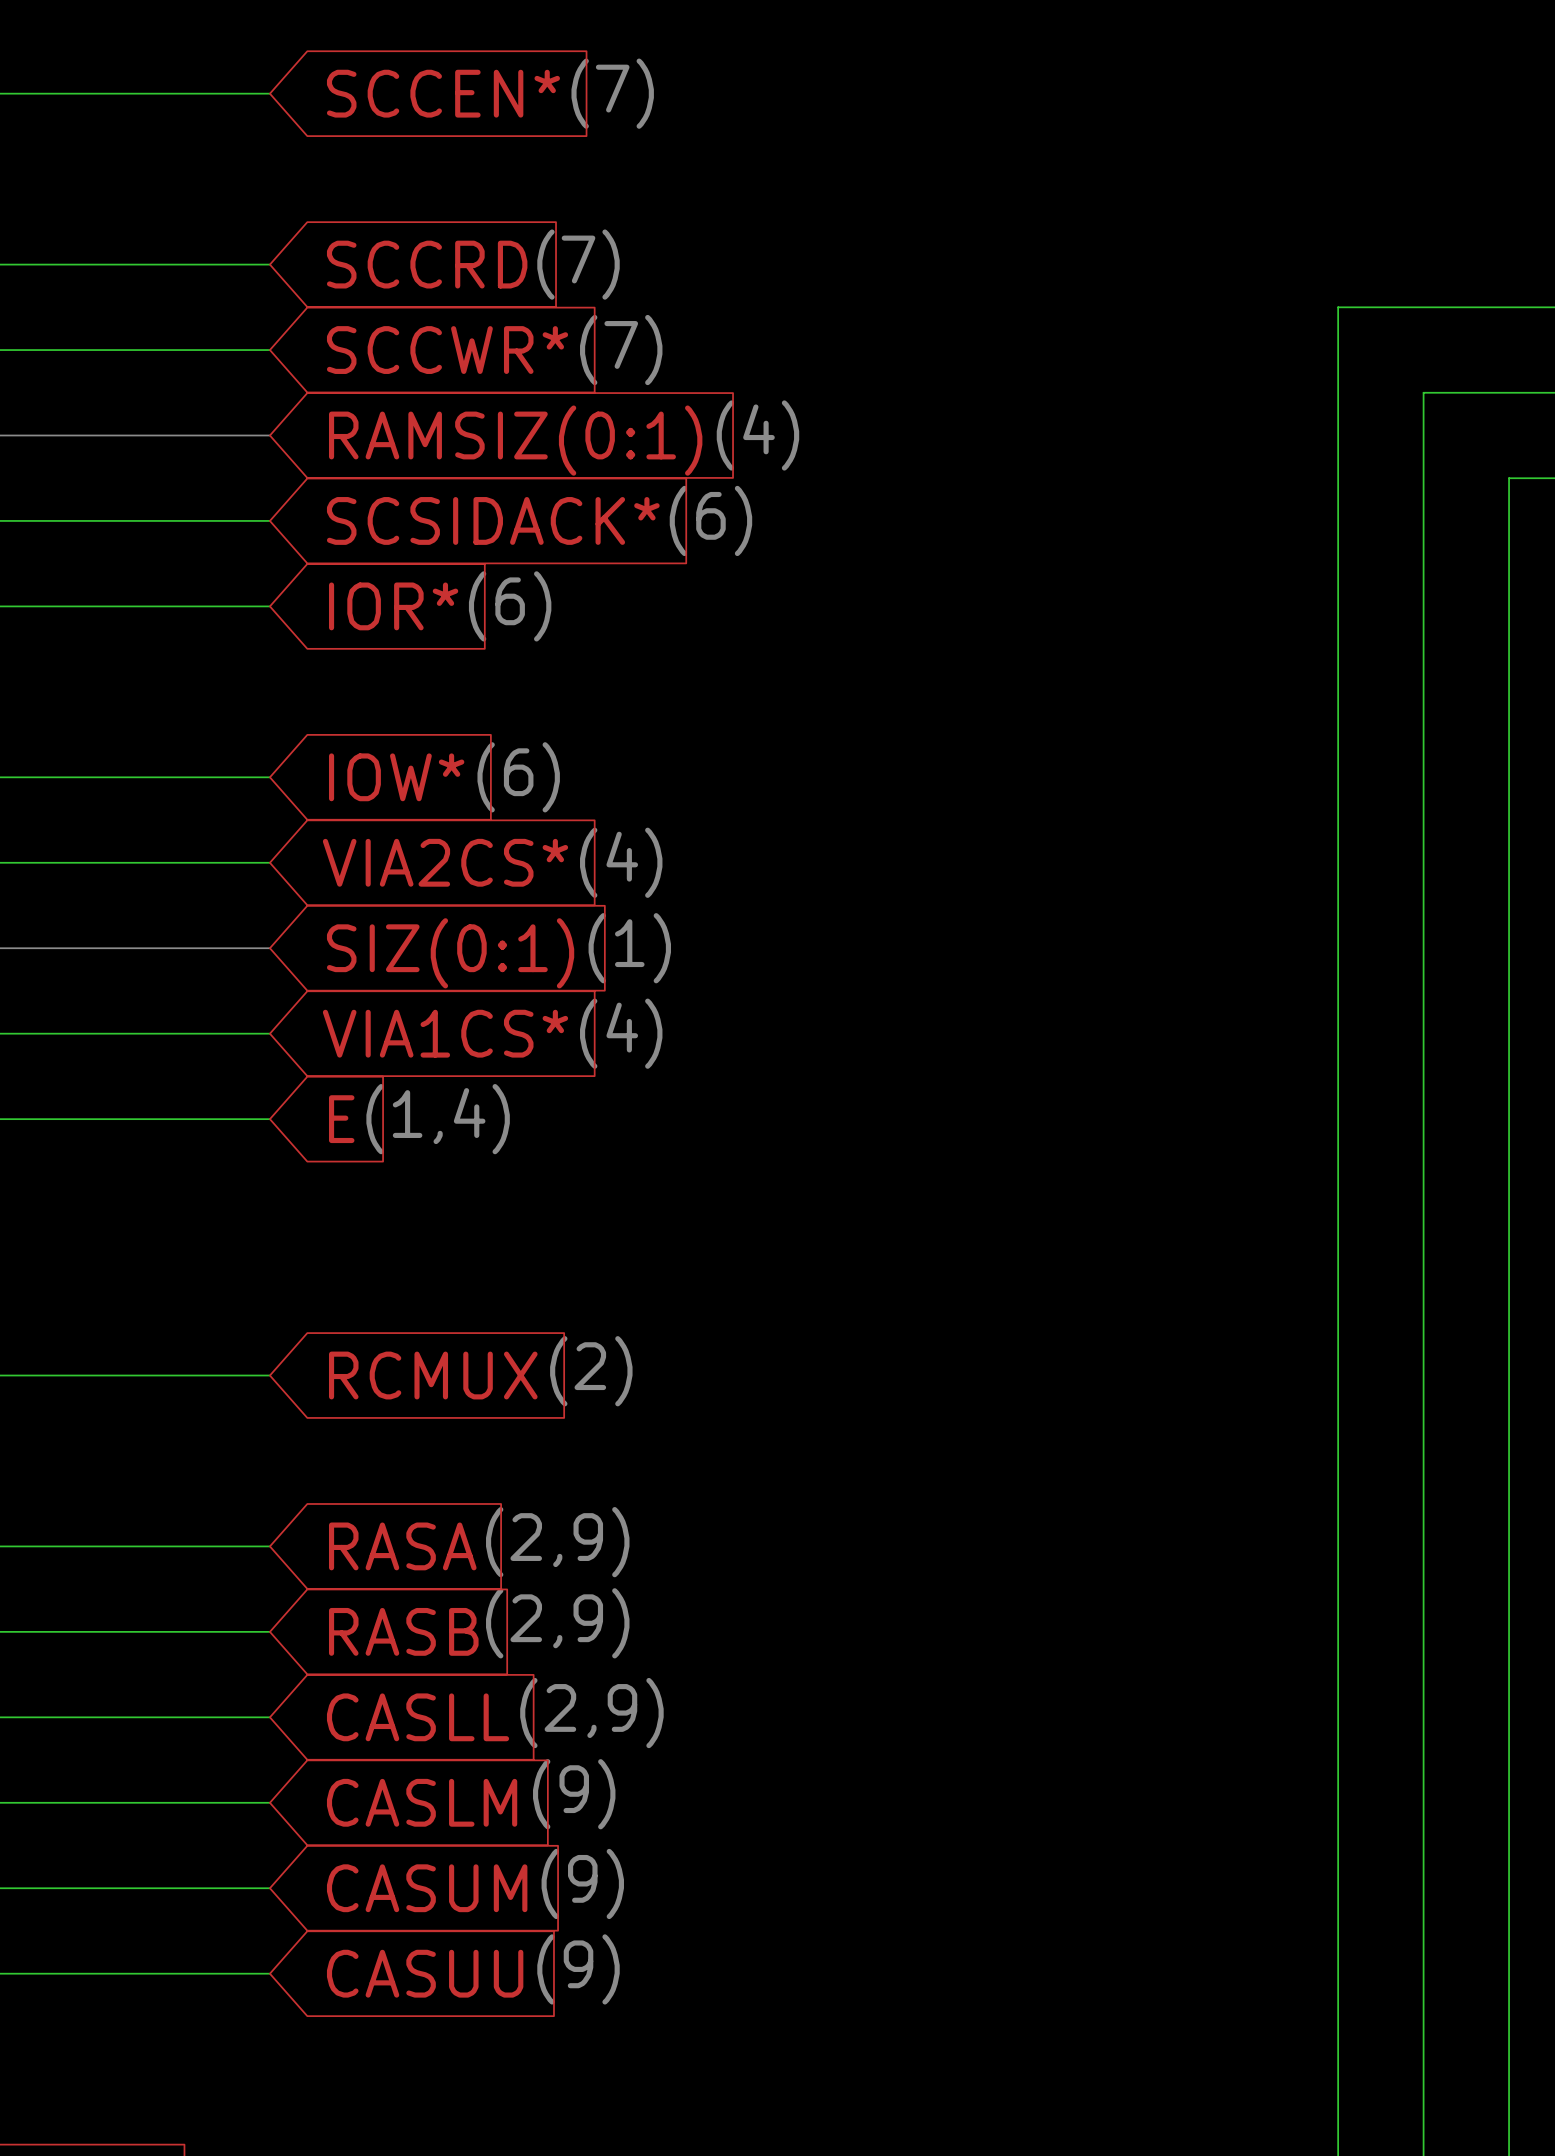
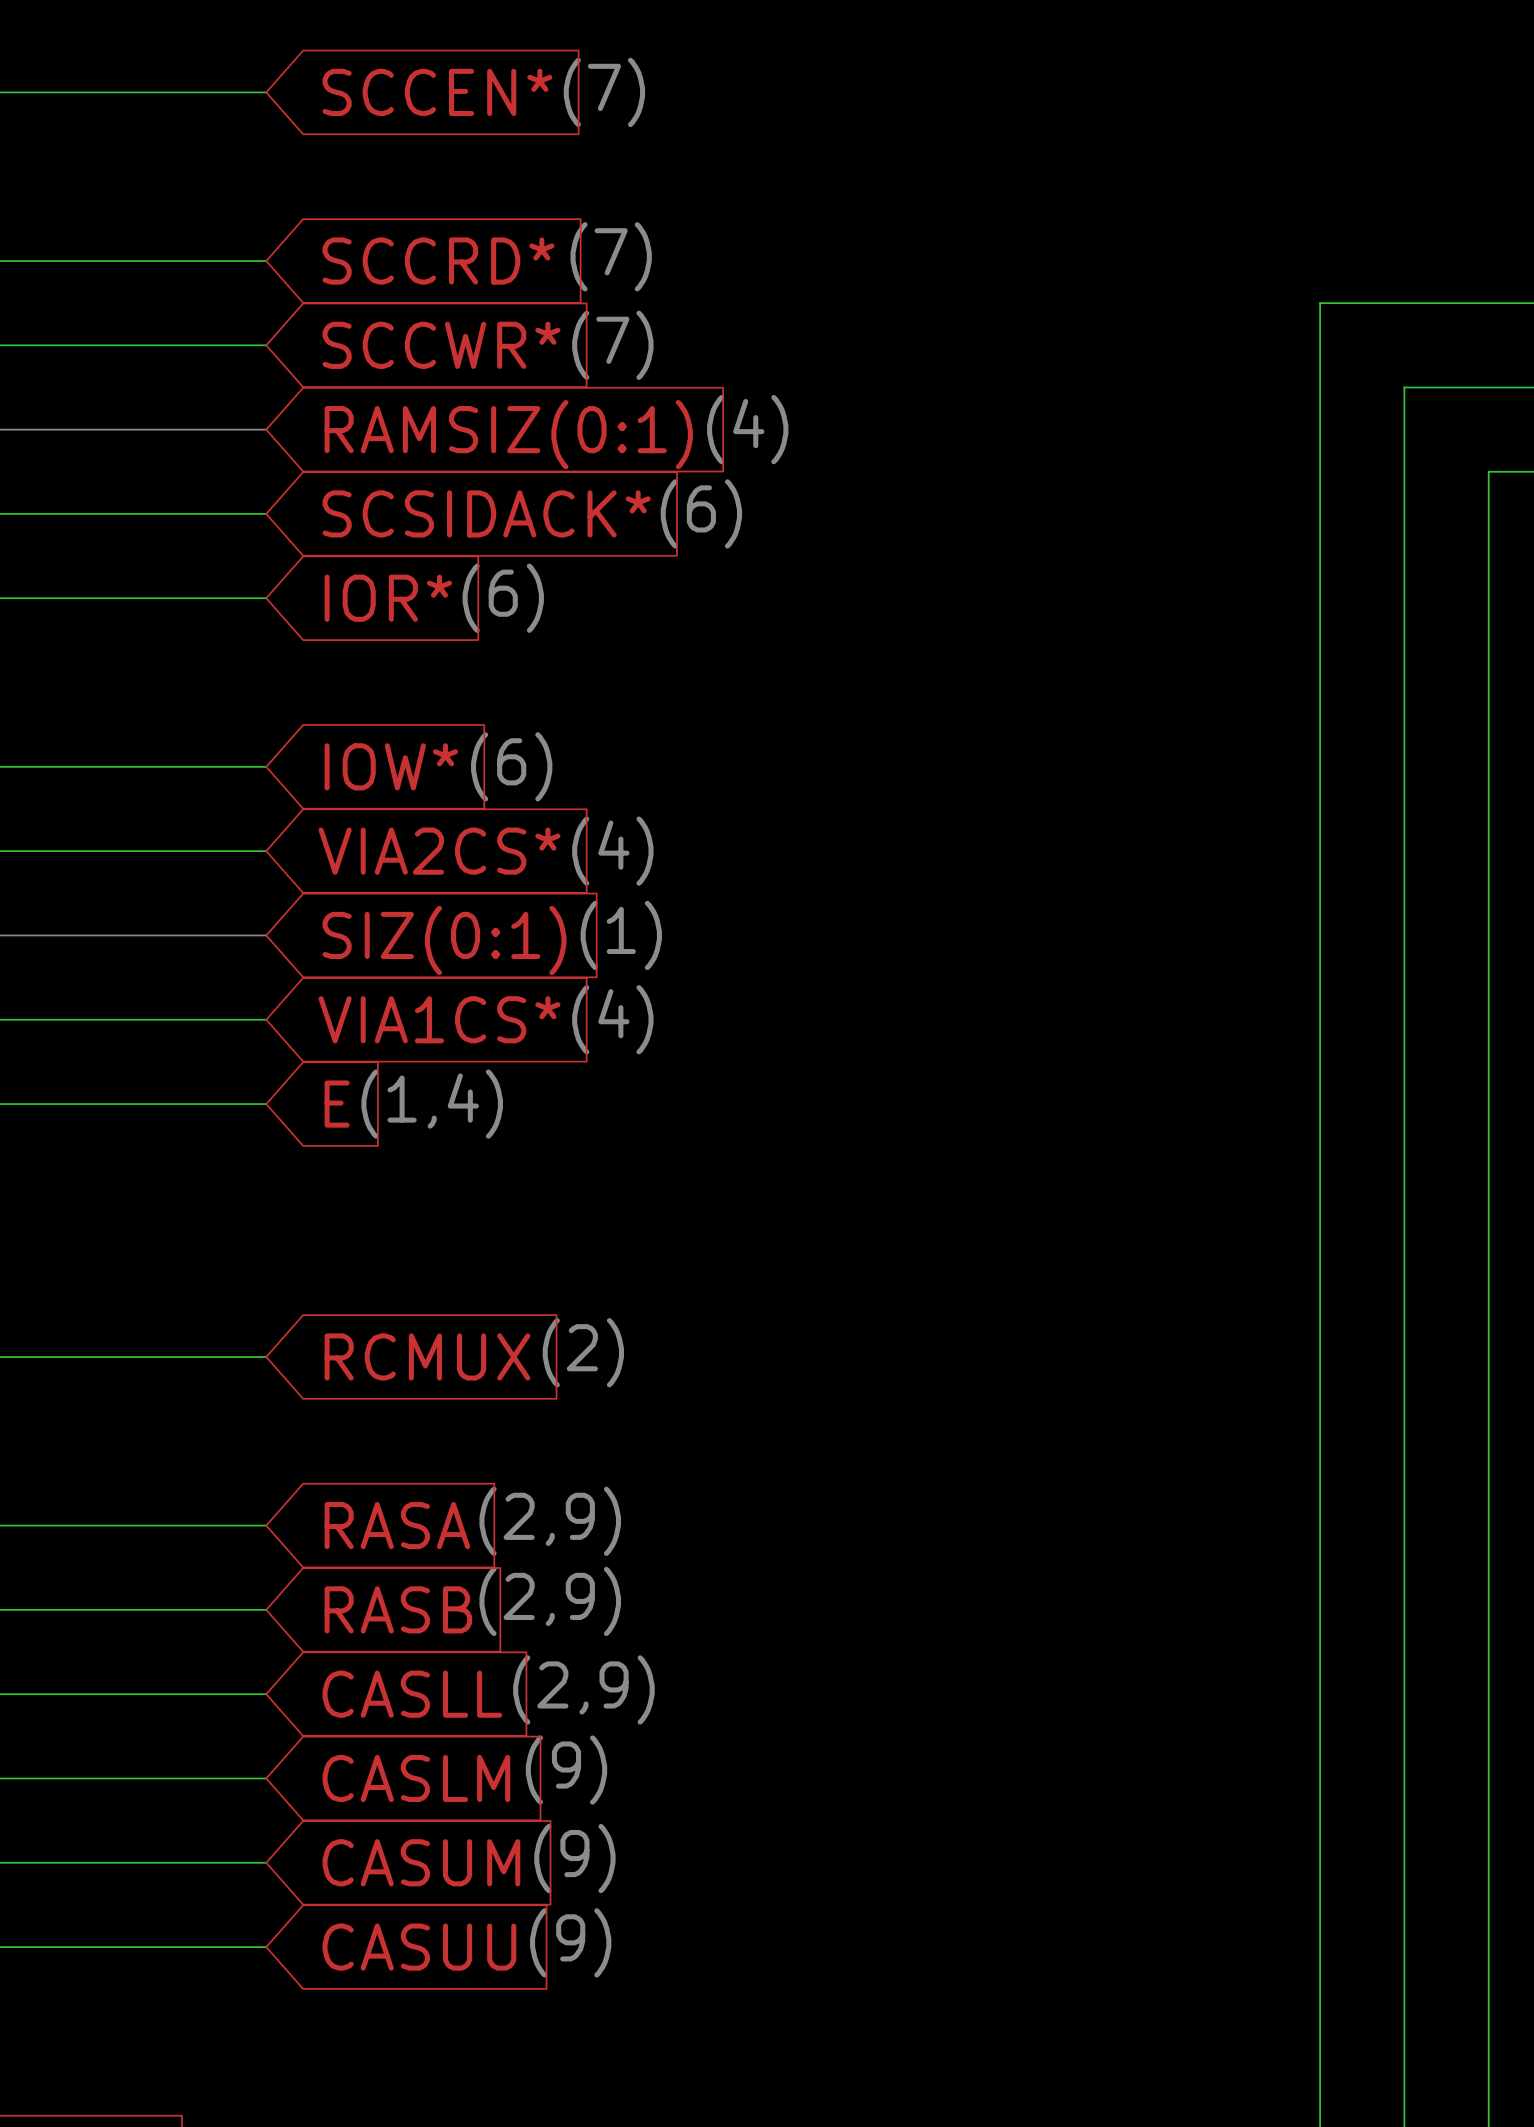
global label: SCCRD (427, 264) -> SCCRD* (438, 261)
text position: (7) (578, 264) -> (7) (611, 256)

